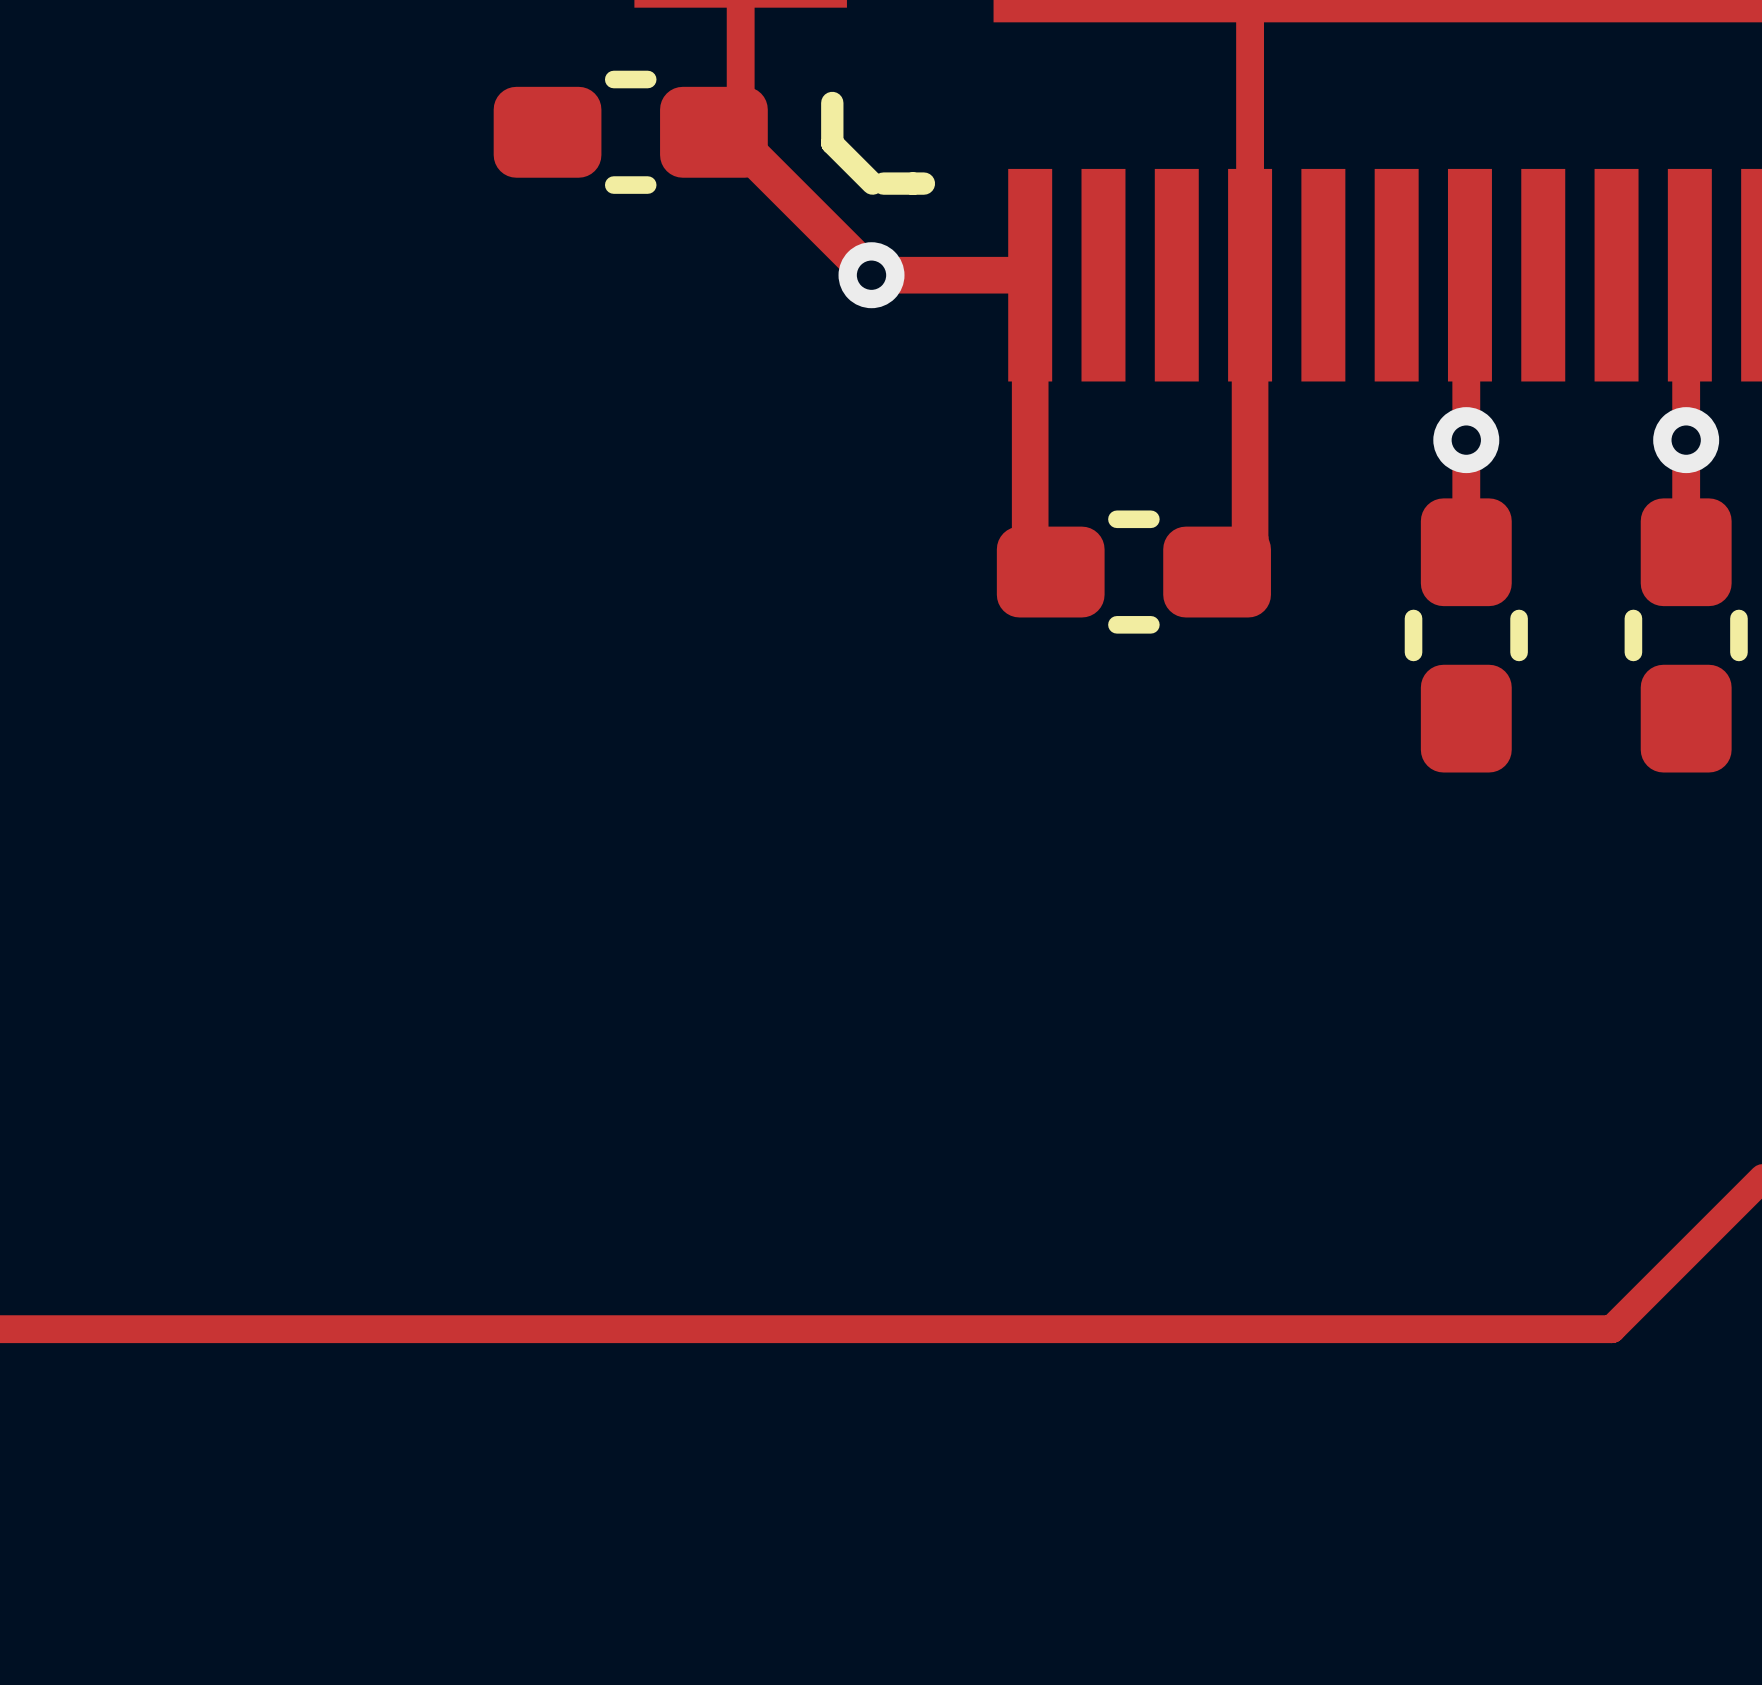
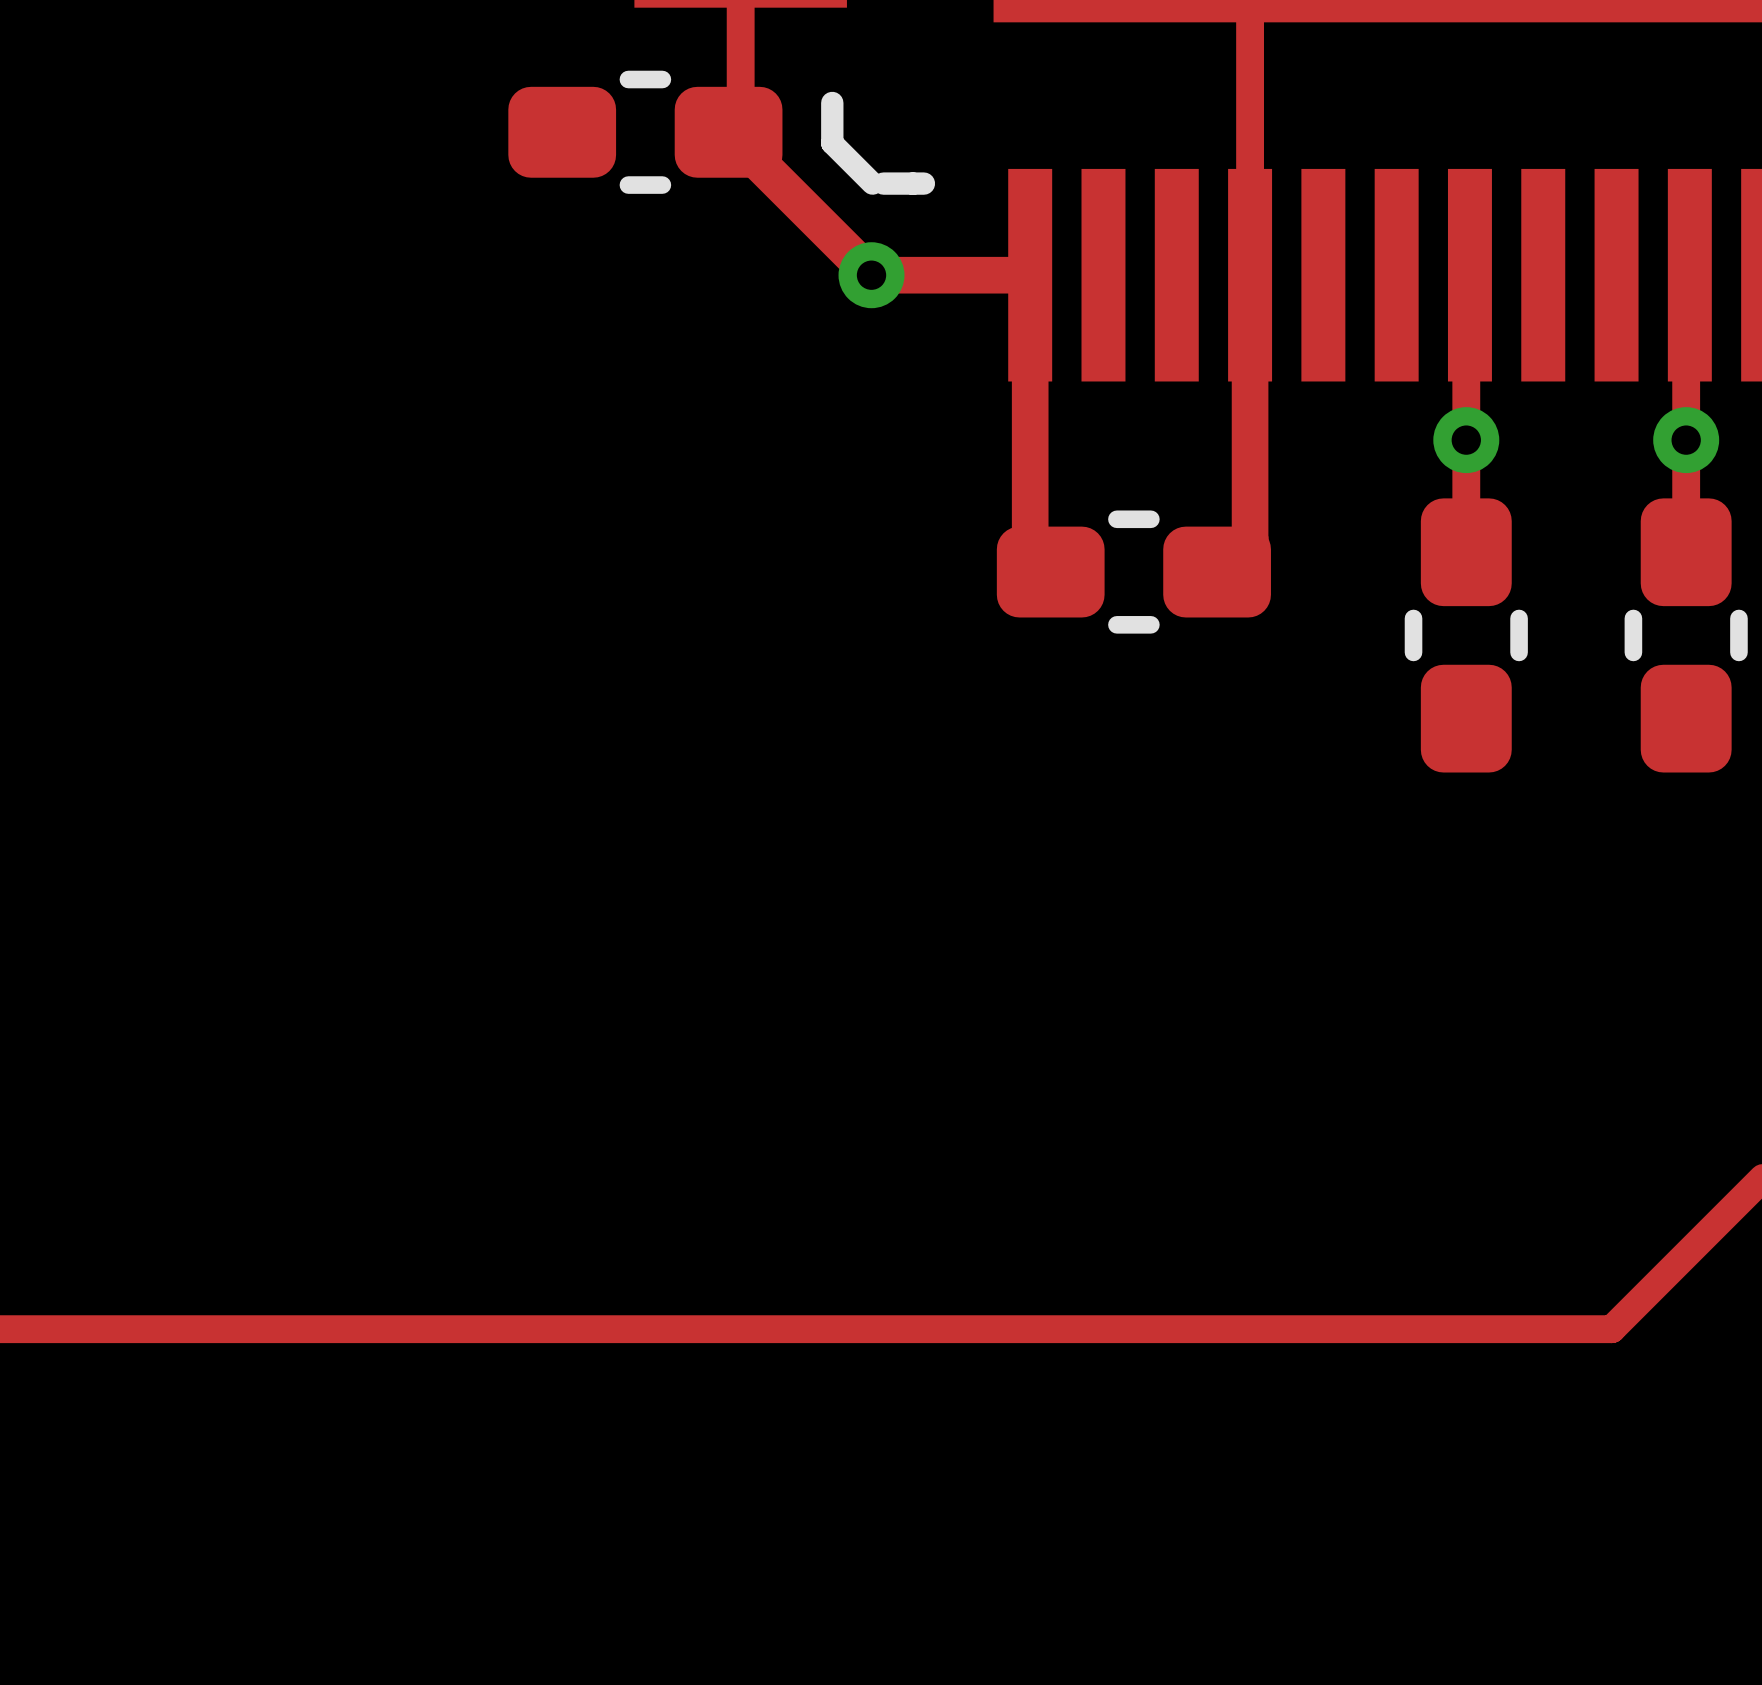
part position: (630, 132) -> (645, 132)

